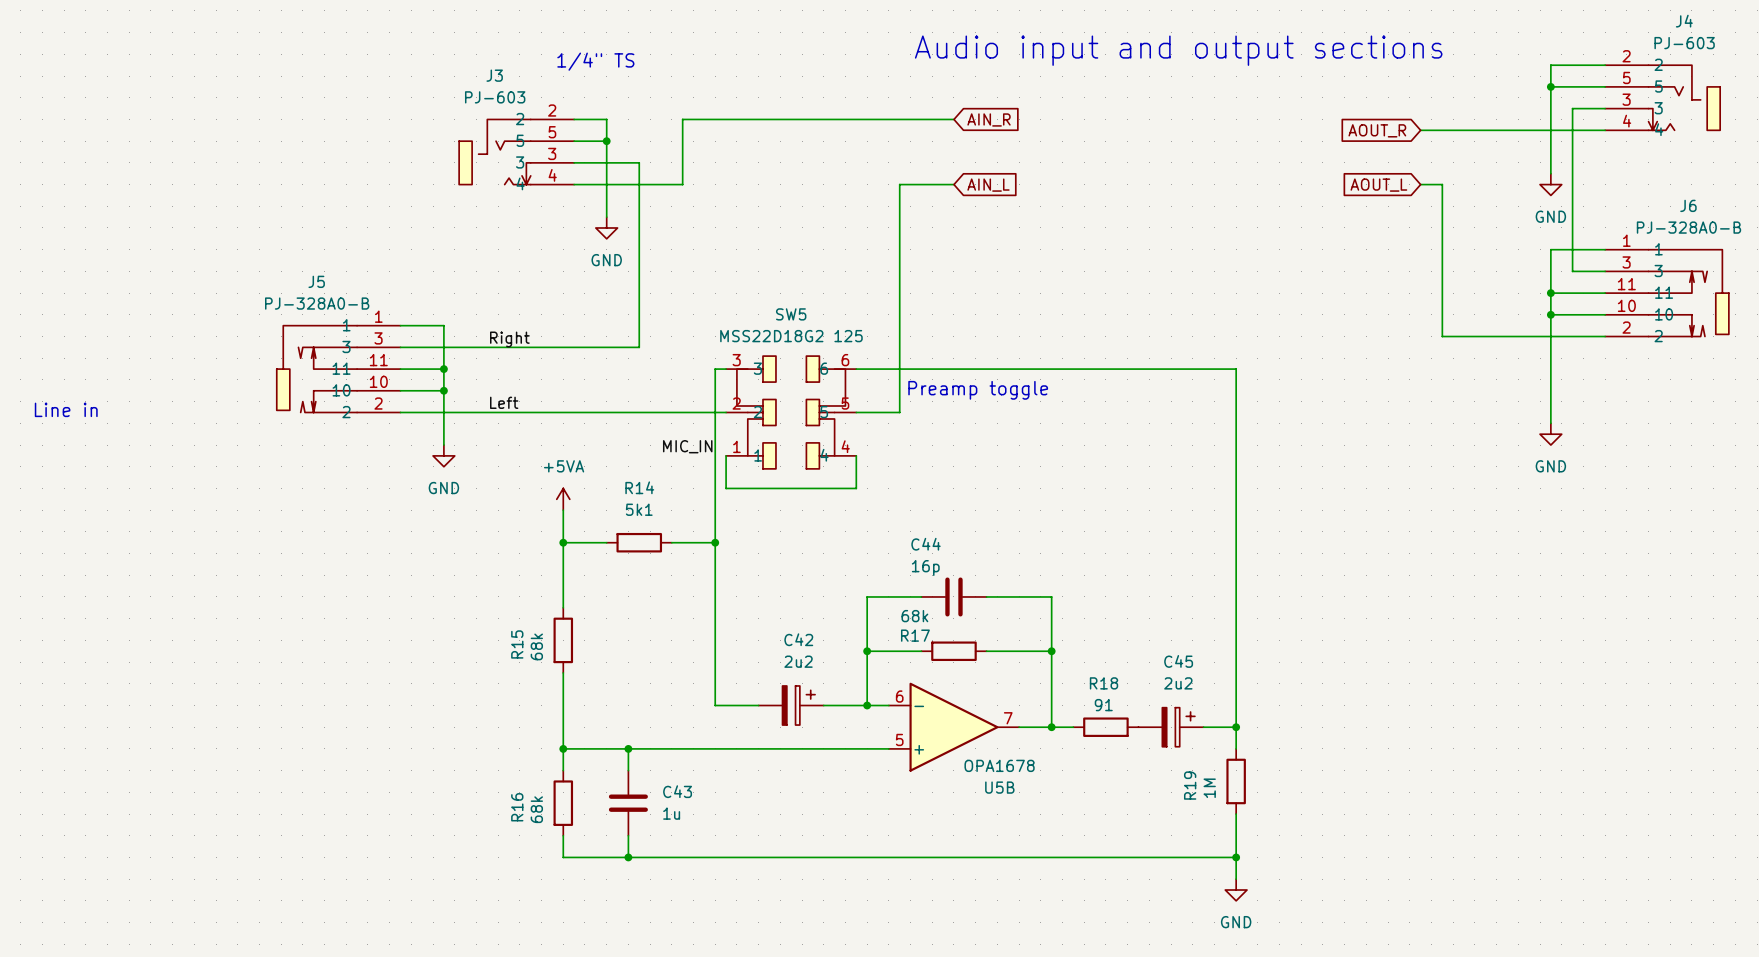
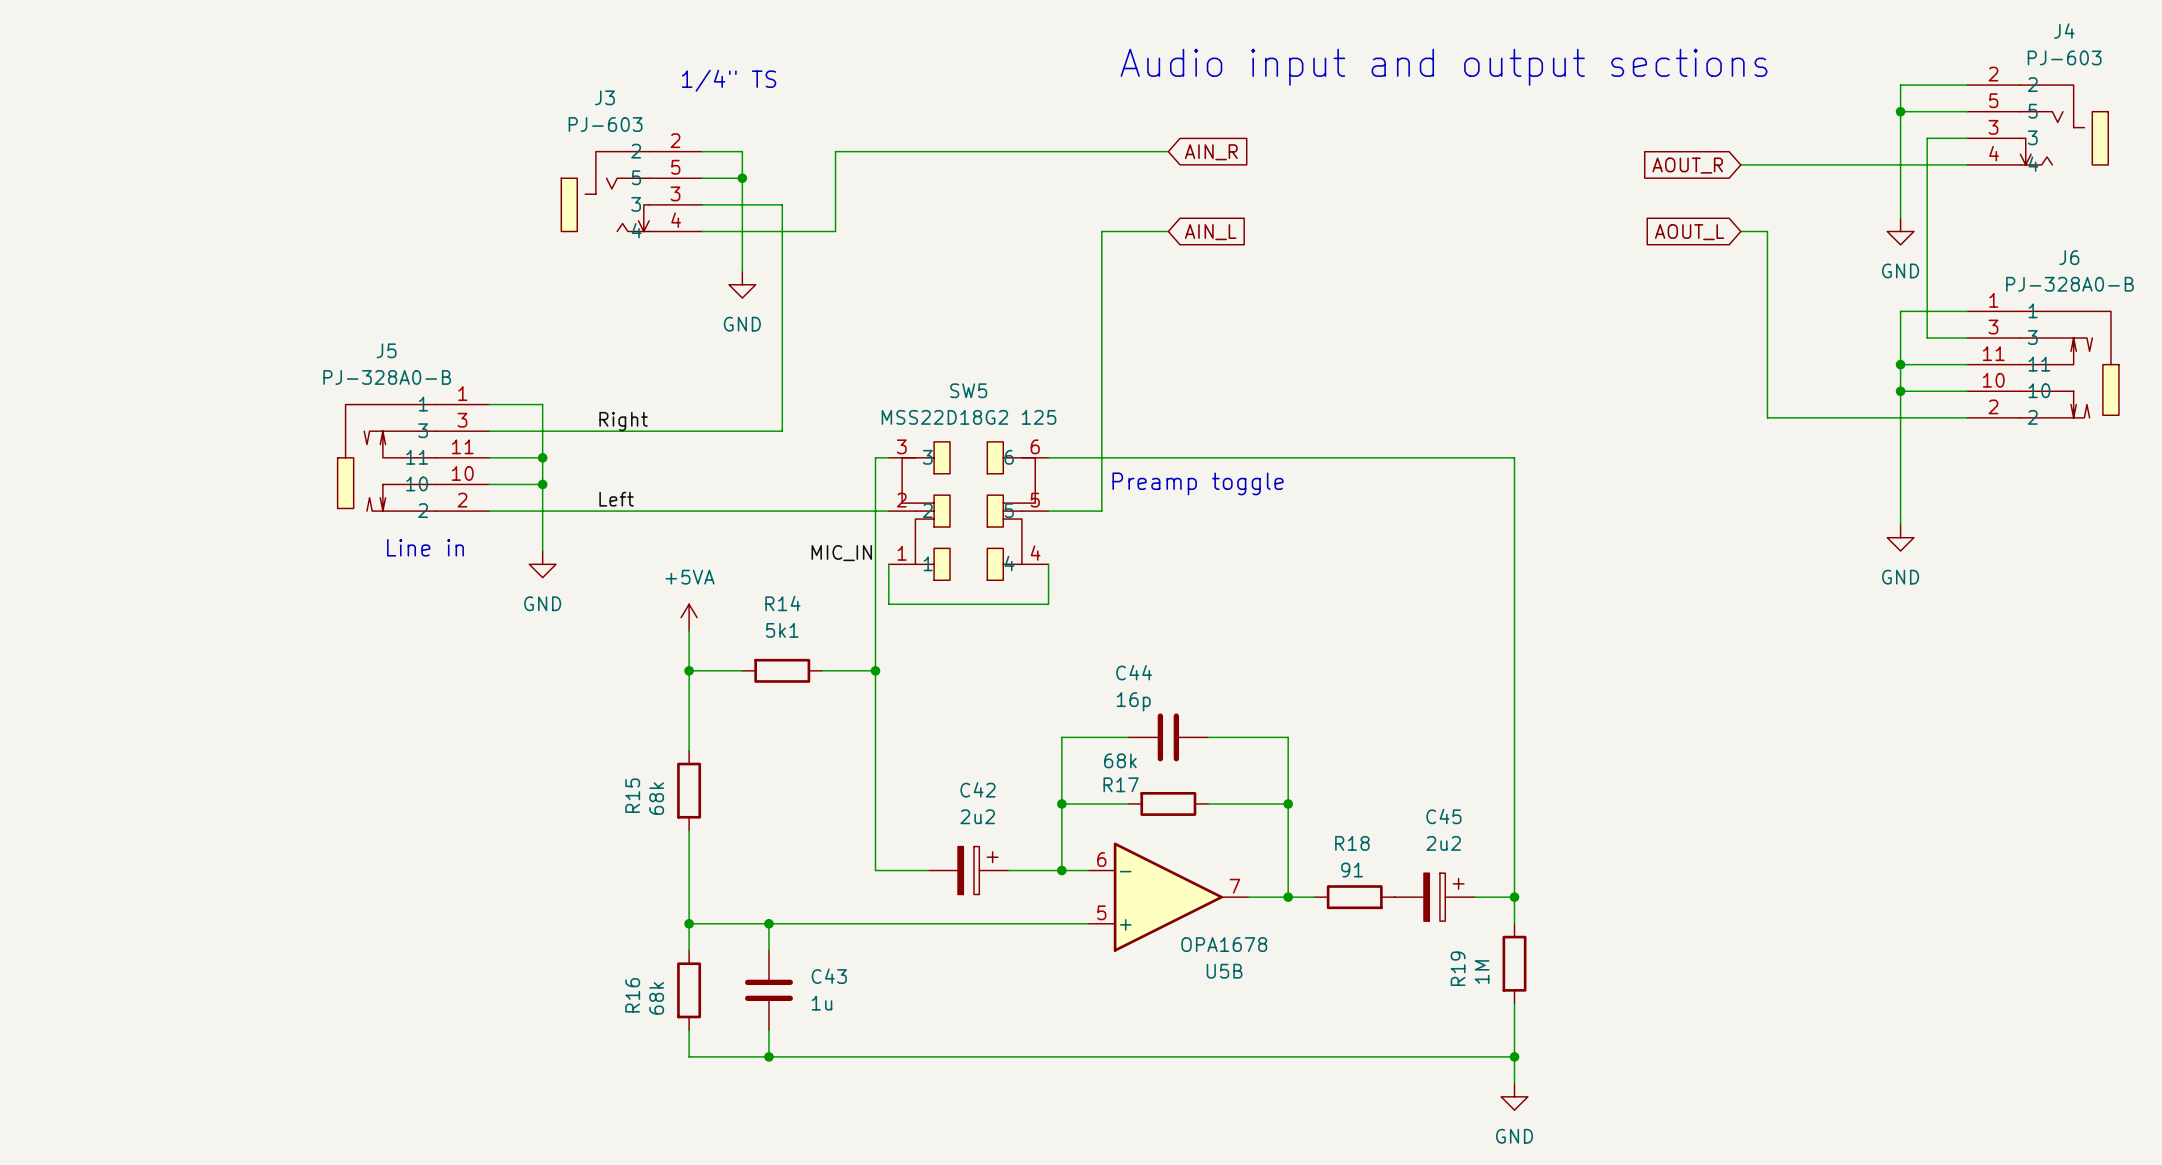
text: Line in (66, 409) -> none
text: none -> Line in (425, 547)

